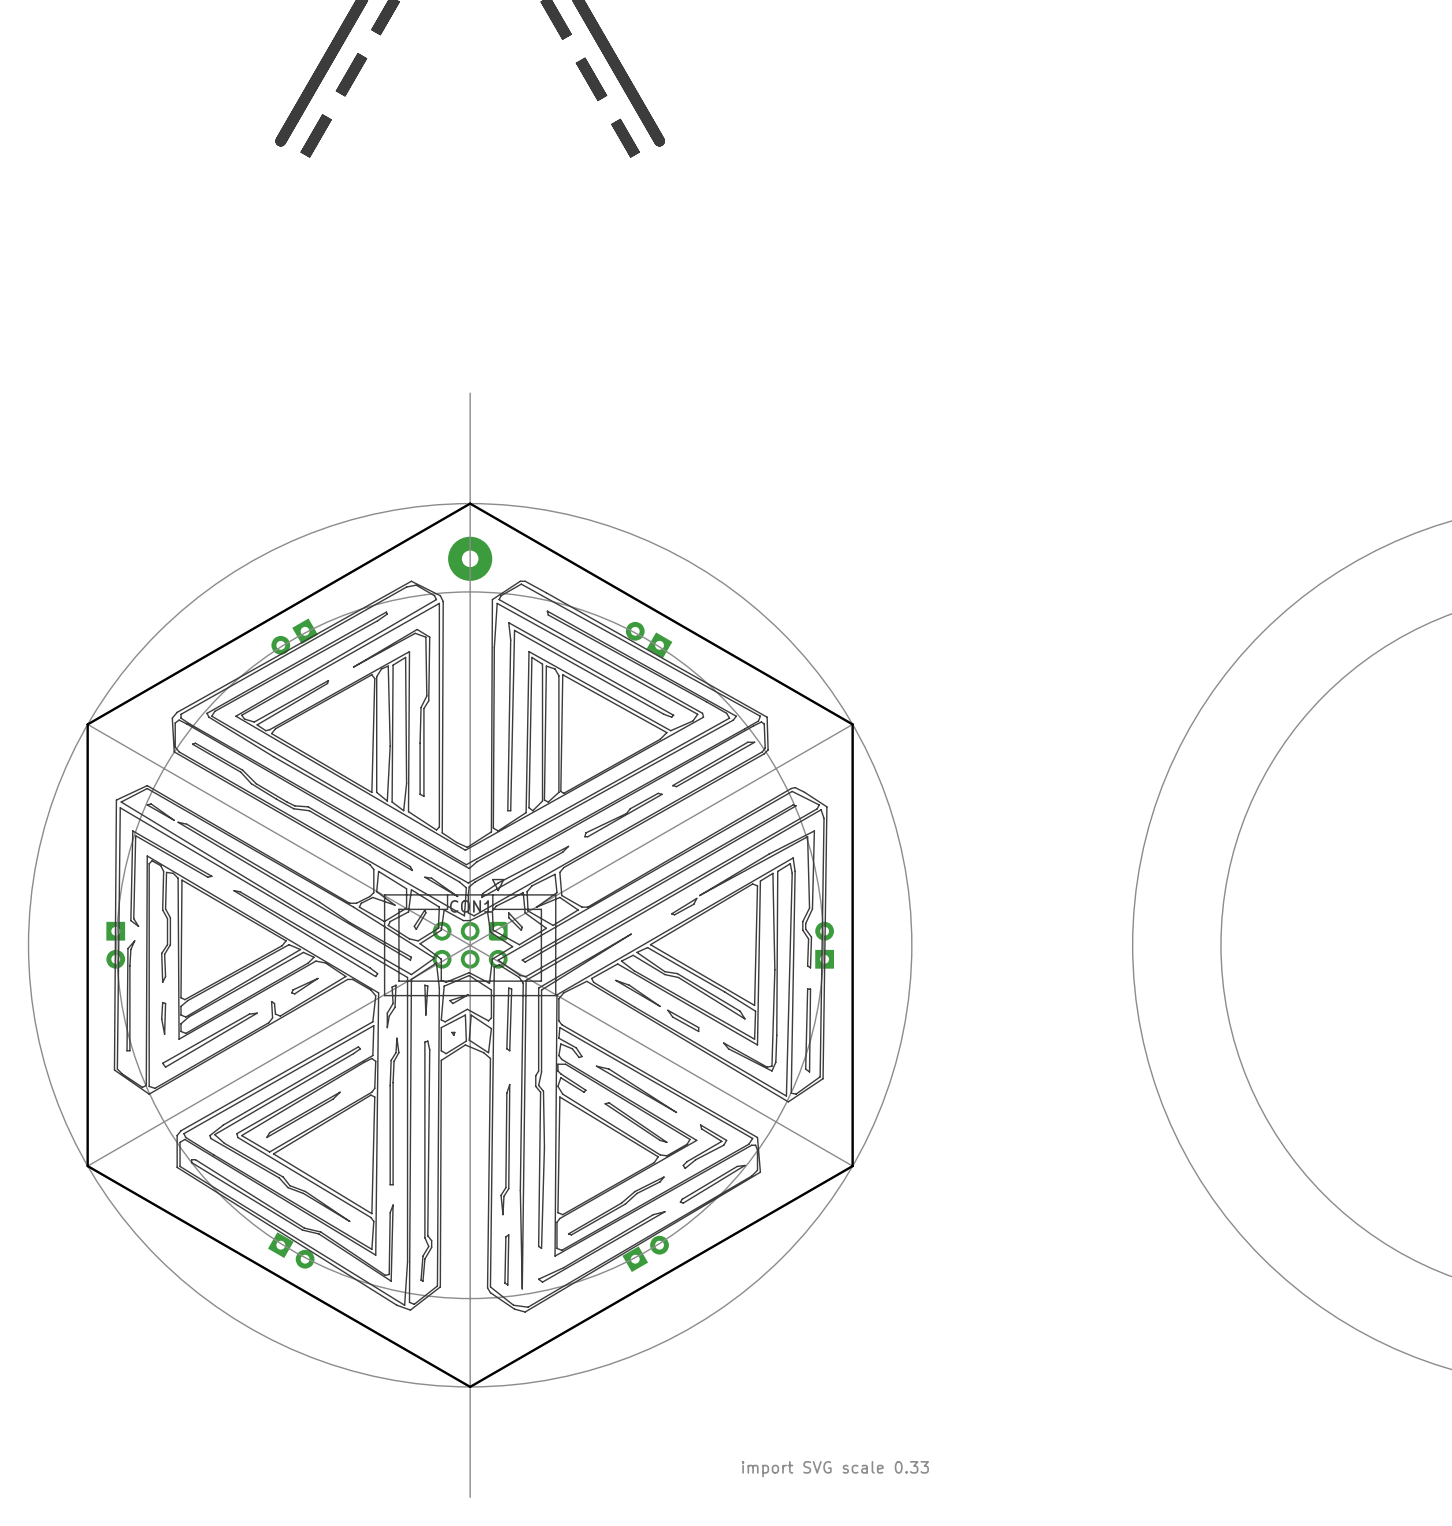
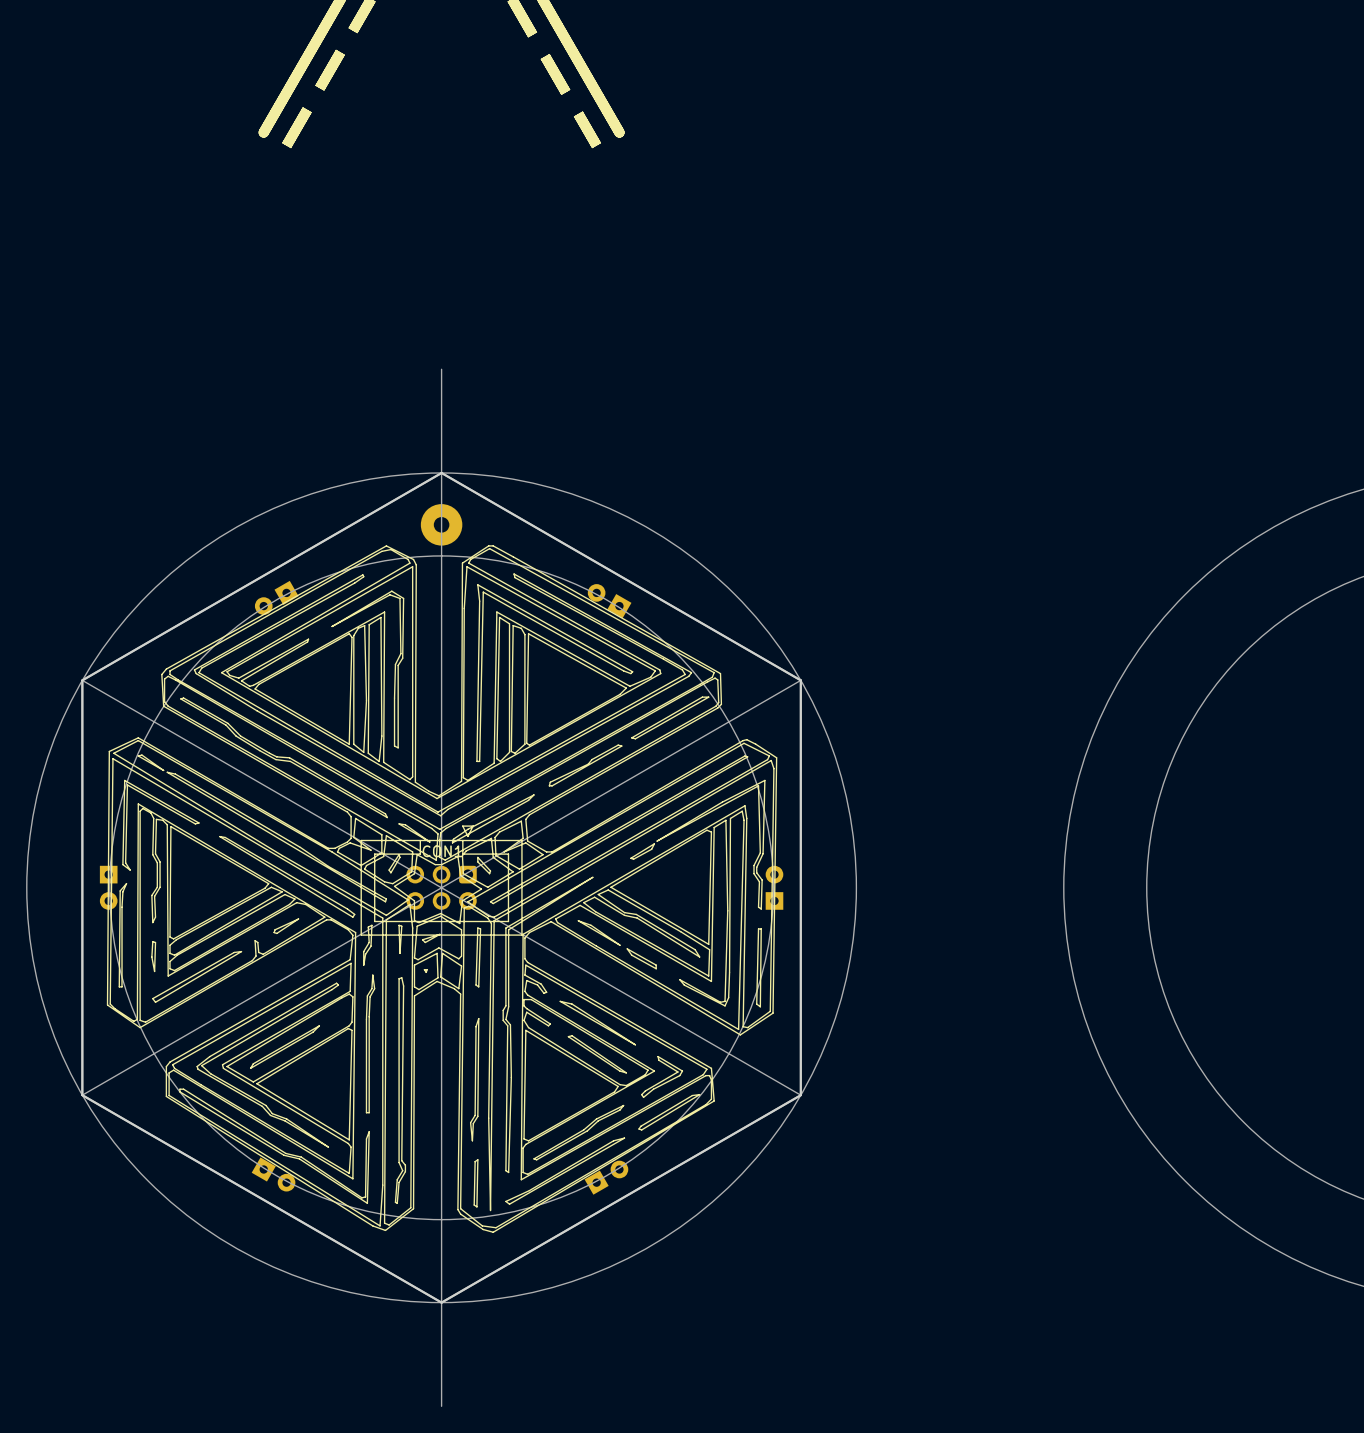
text: import SVG scale 0.33 (835, 1469) -> none

